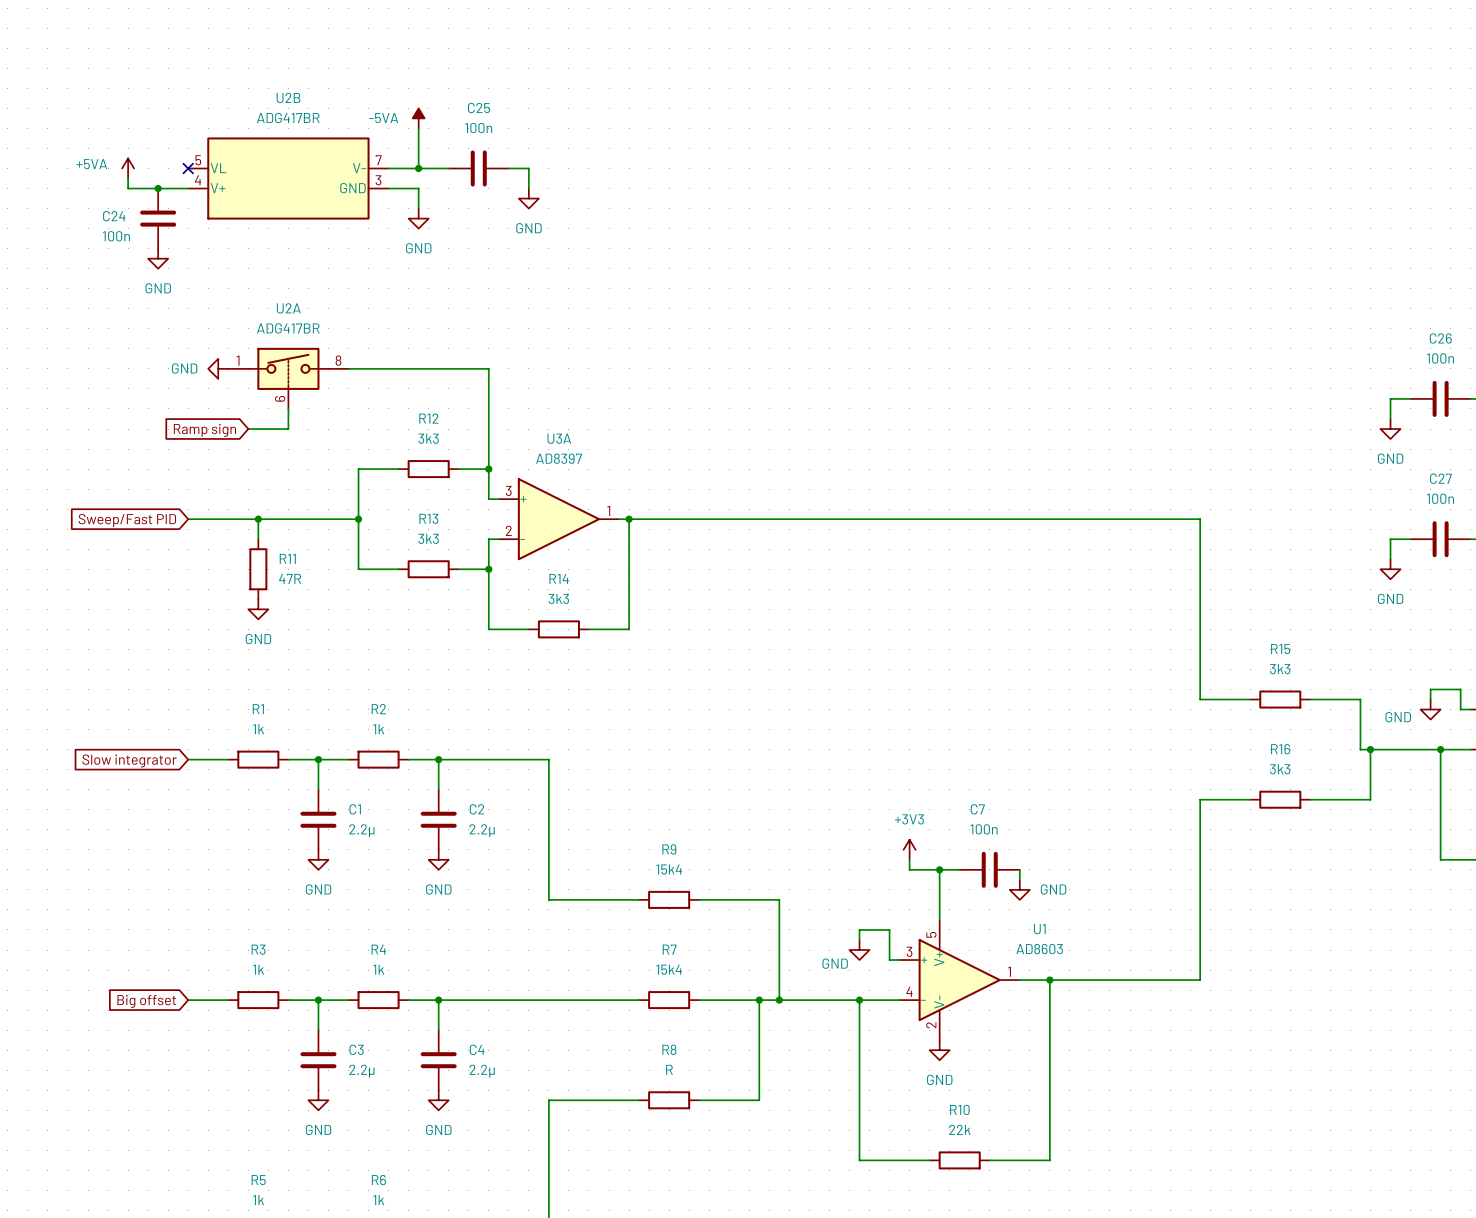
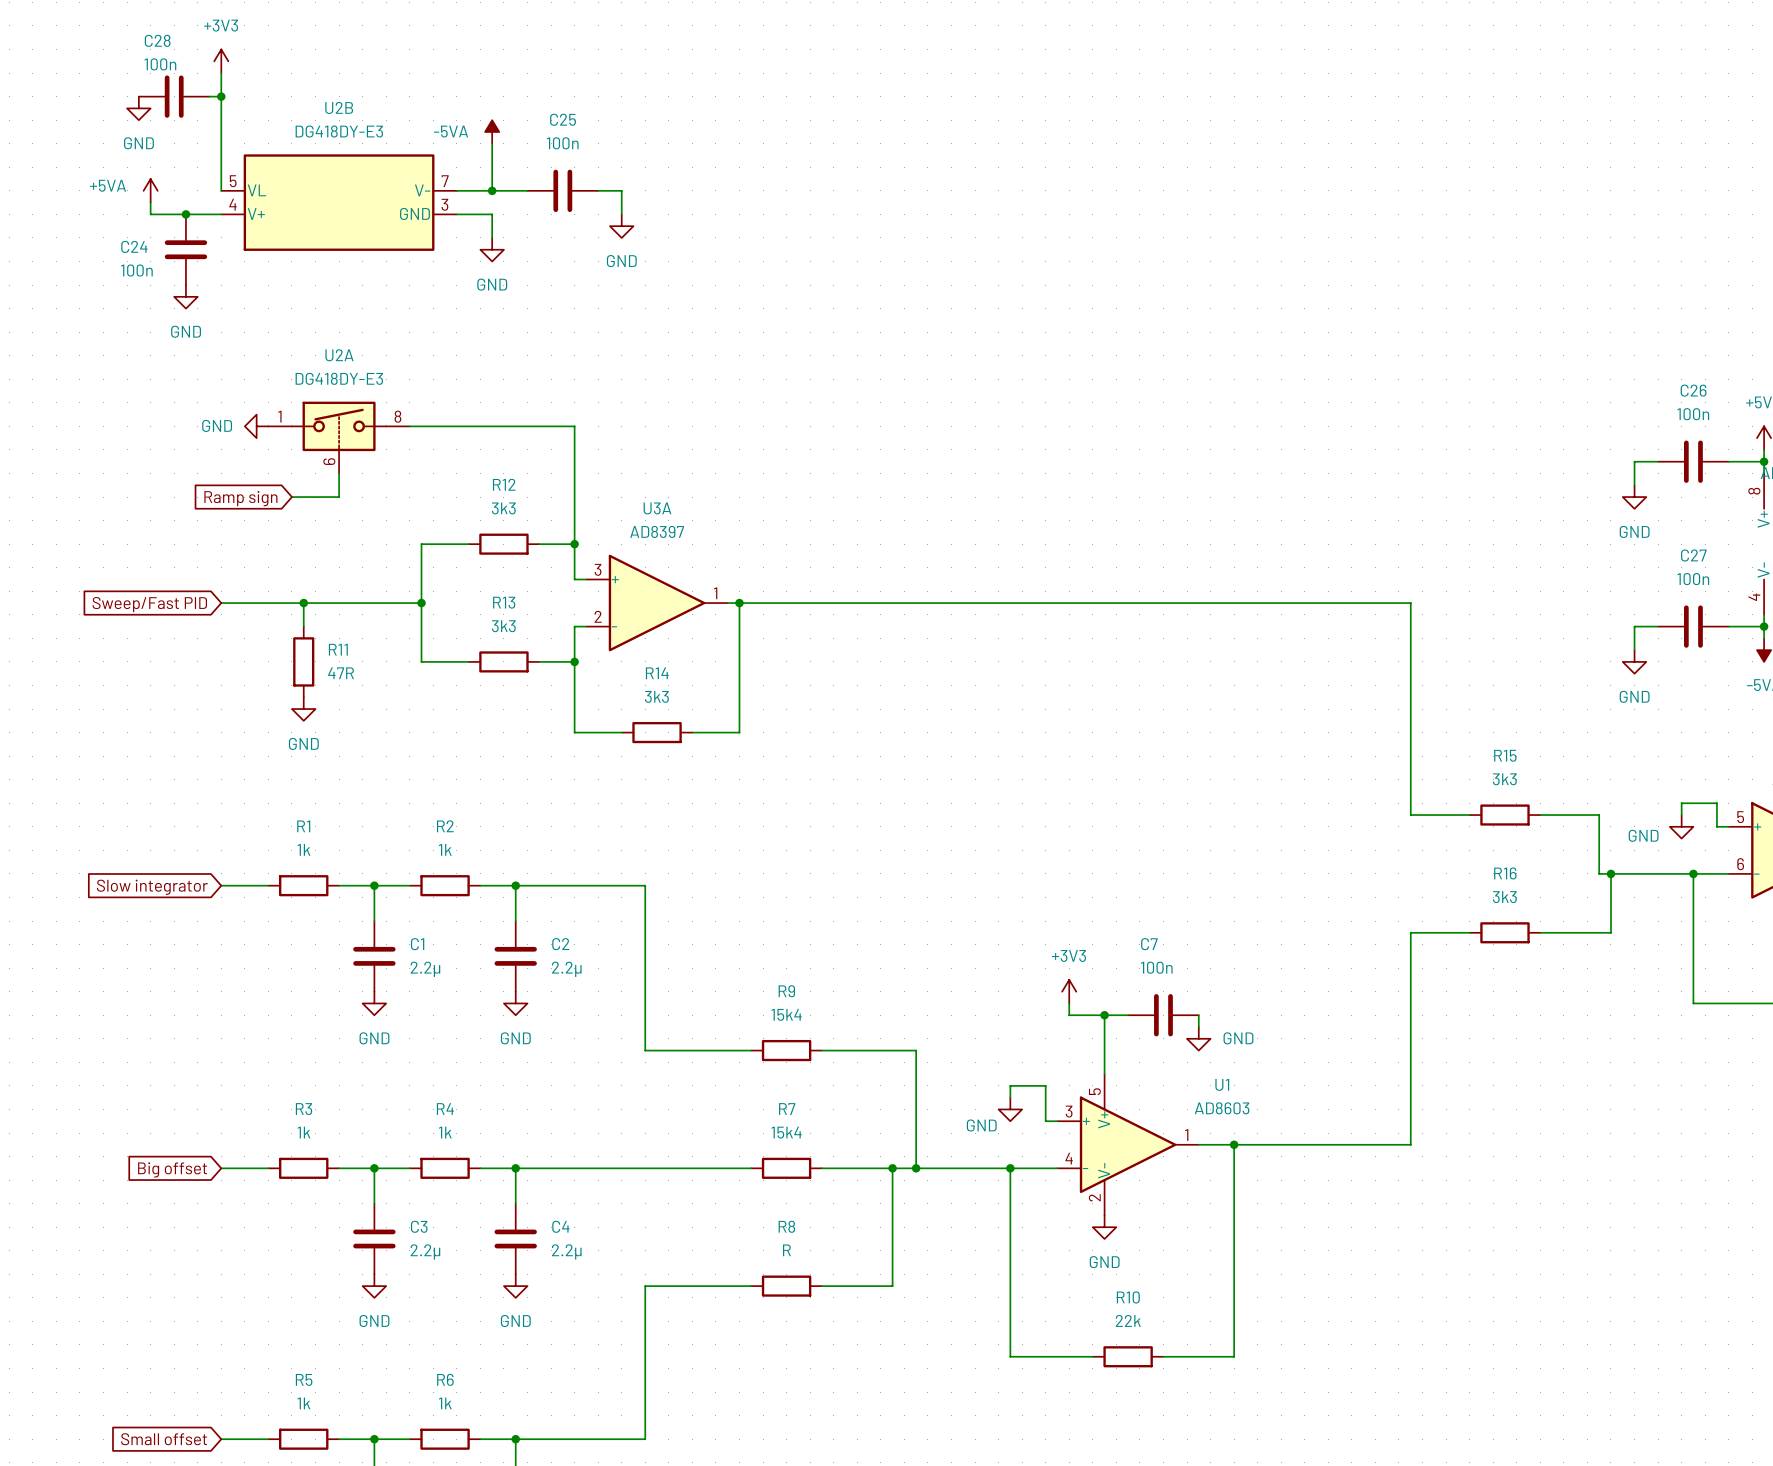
power symbol: none -> +3V3 (221, 61)
wire: none -> (221, 73) (221, 190)
C28: none -> 100n (174, 96)
wire: none -> (209, 96) (221, 96)
junction: none -> (221, 96)
power symbol: none -> GND (138, 108)
U2B value: ADG417BR (288, 118) -> DG418DY-E3 (339, 131)
no-connect mark: (188, 168) -> none
U2A value: ADG417BR (288, 328) -> DG418DY-E3 (339, 378)

